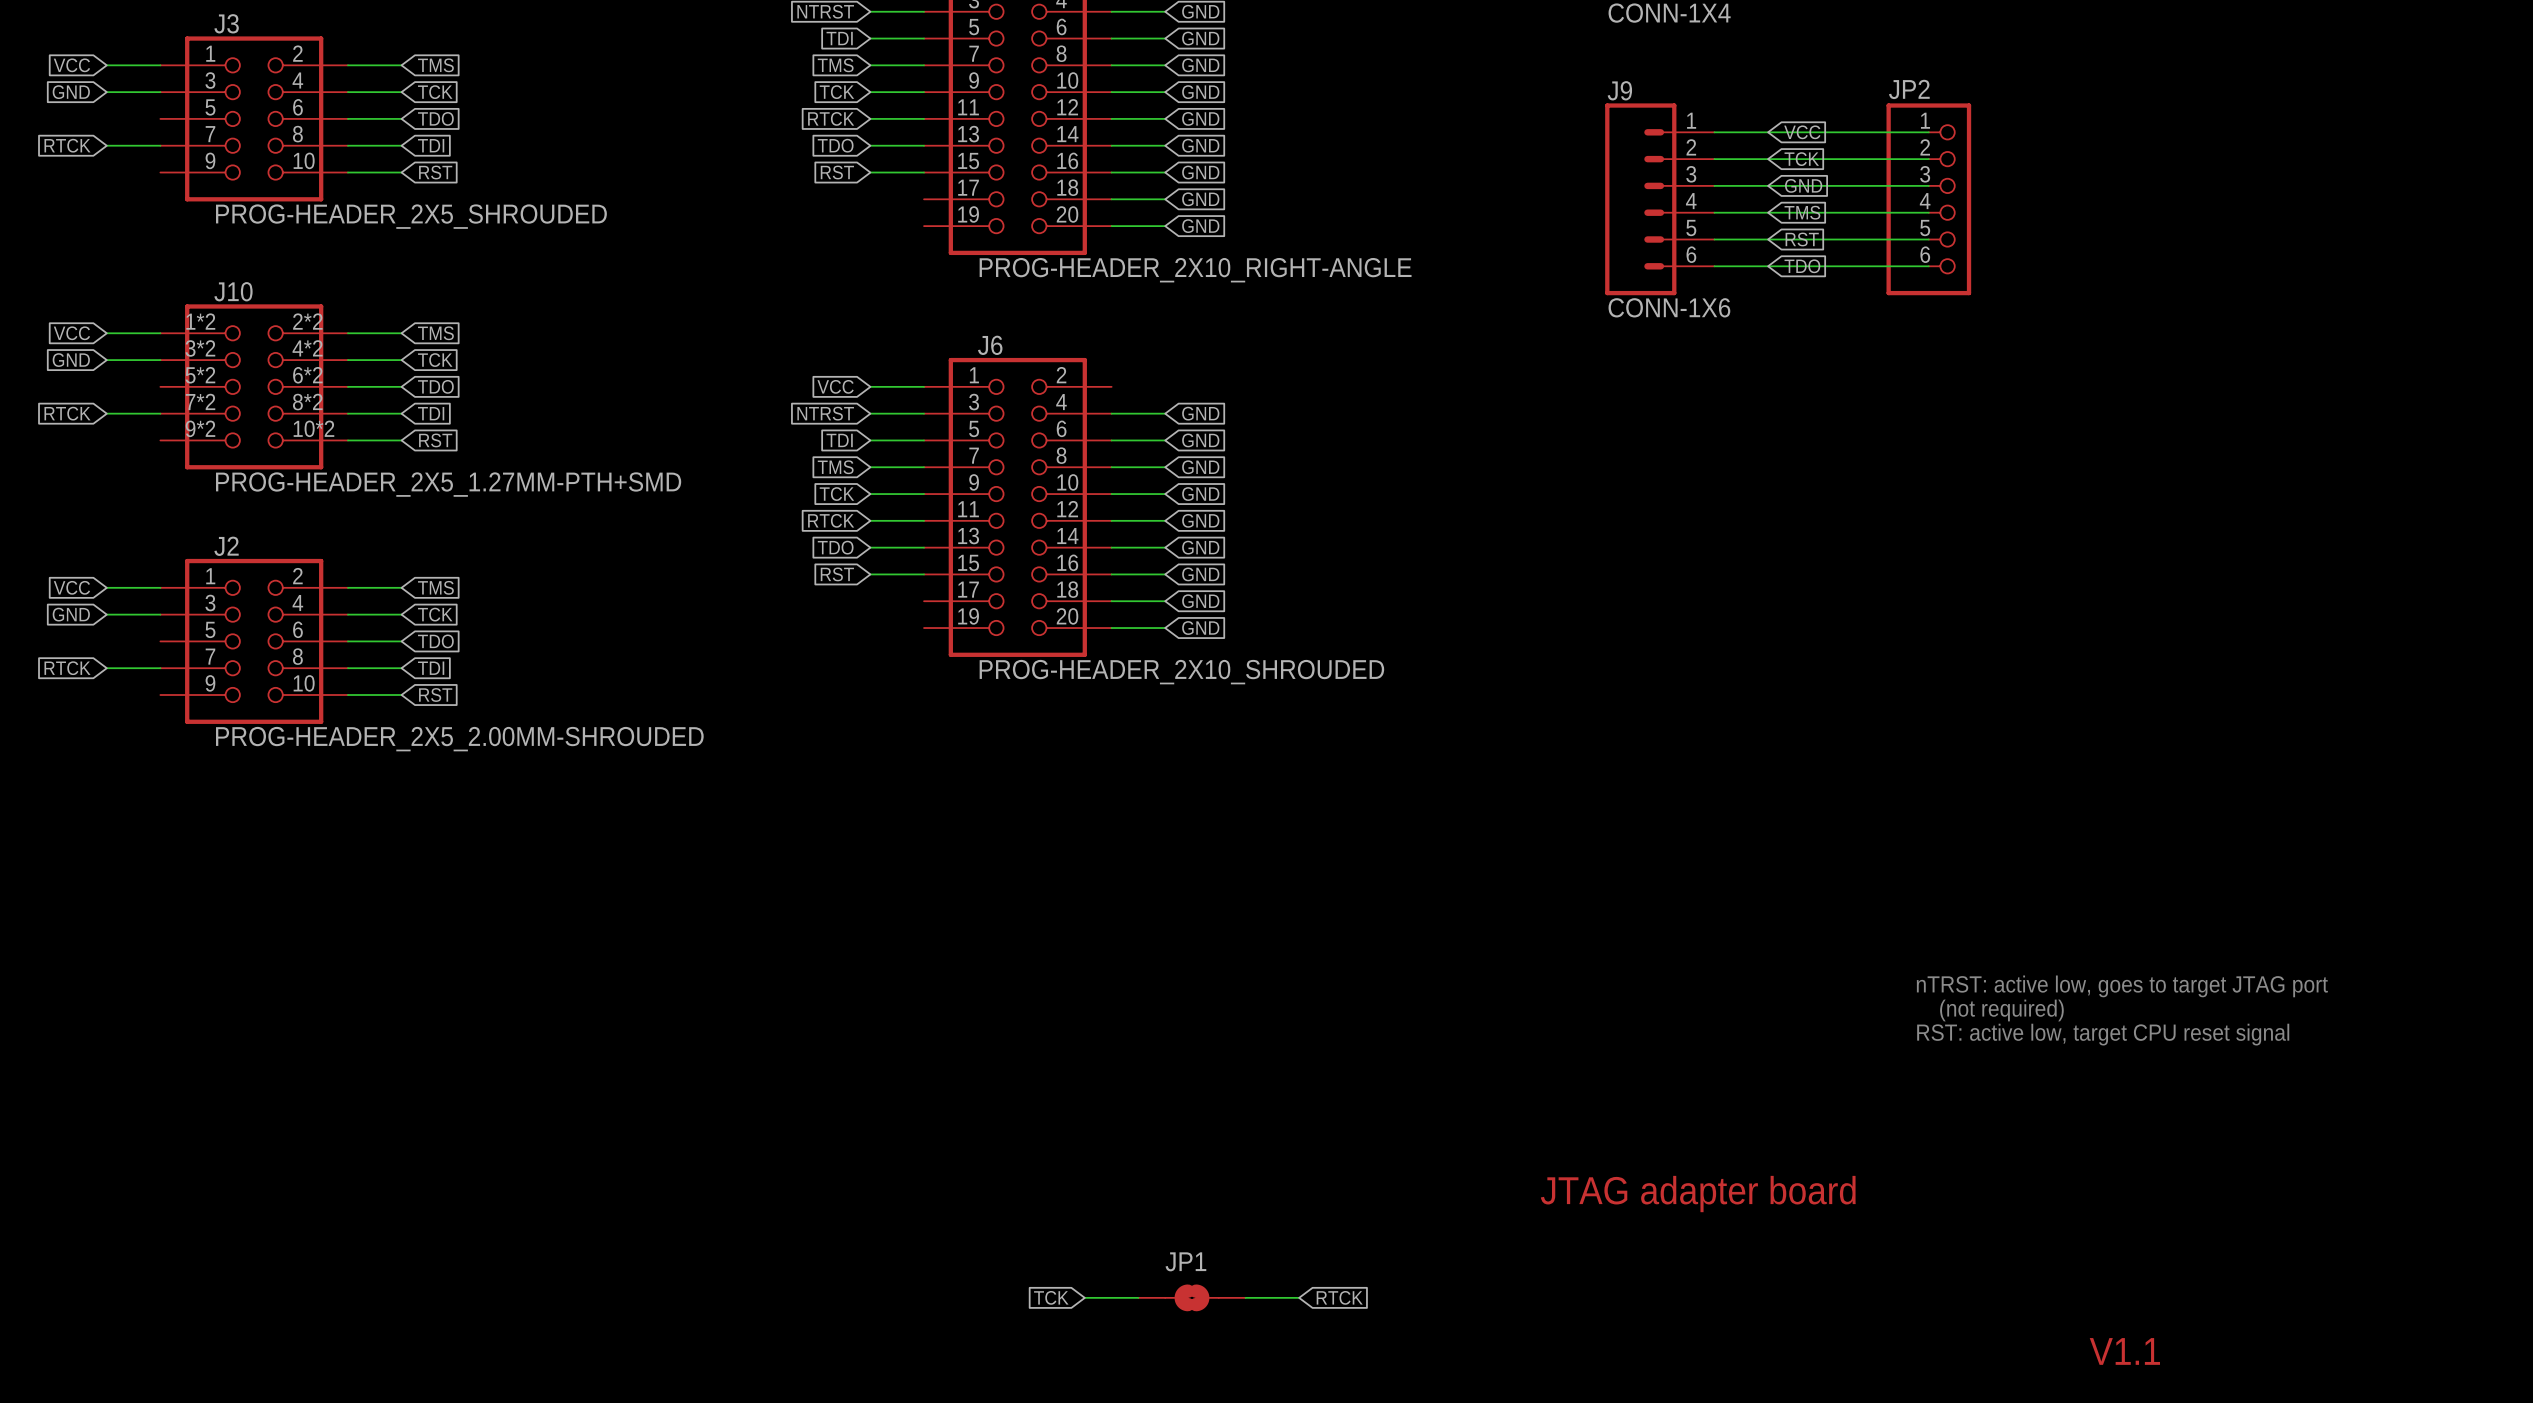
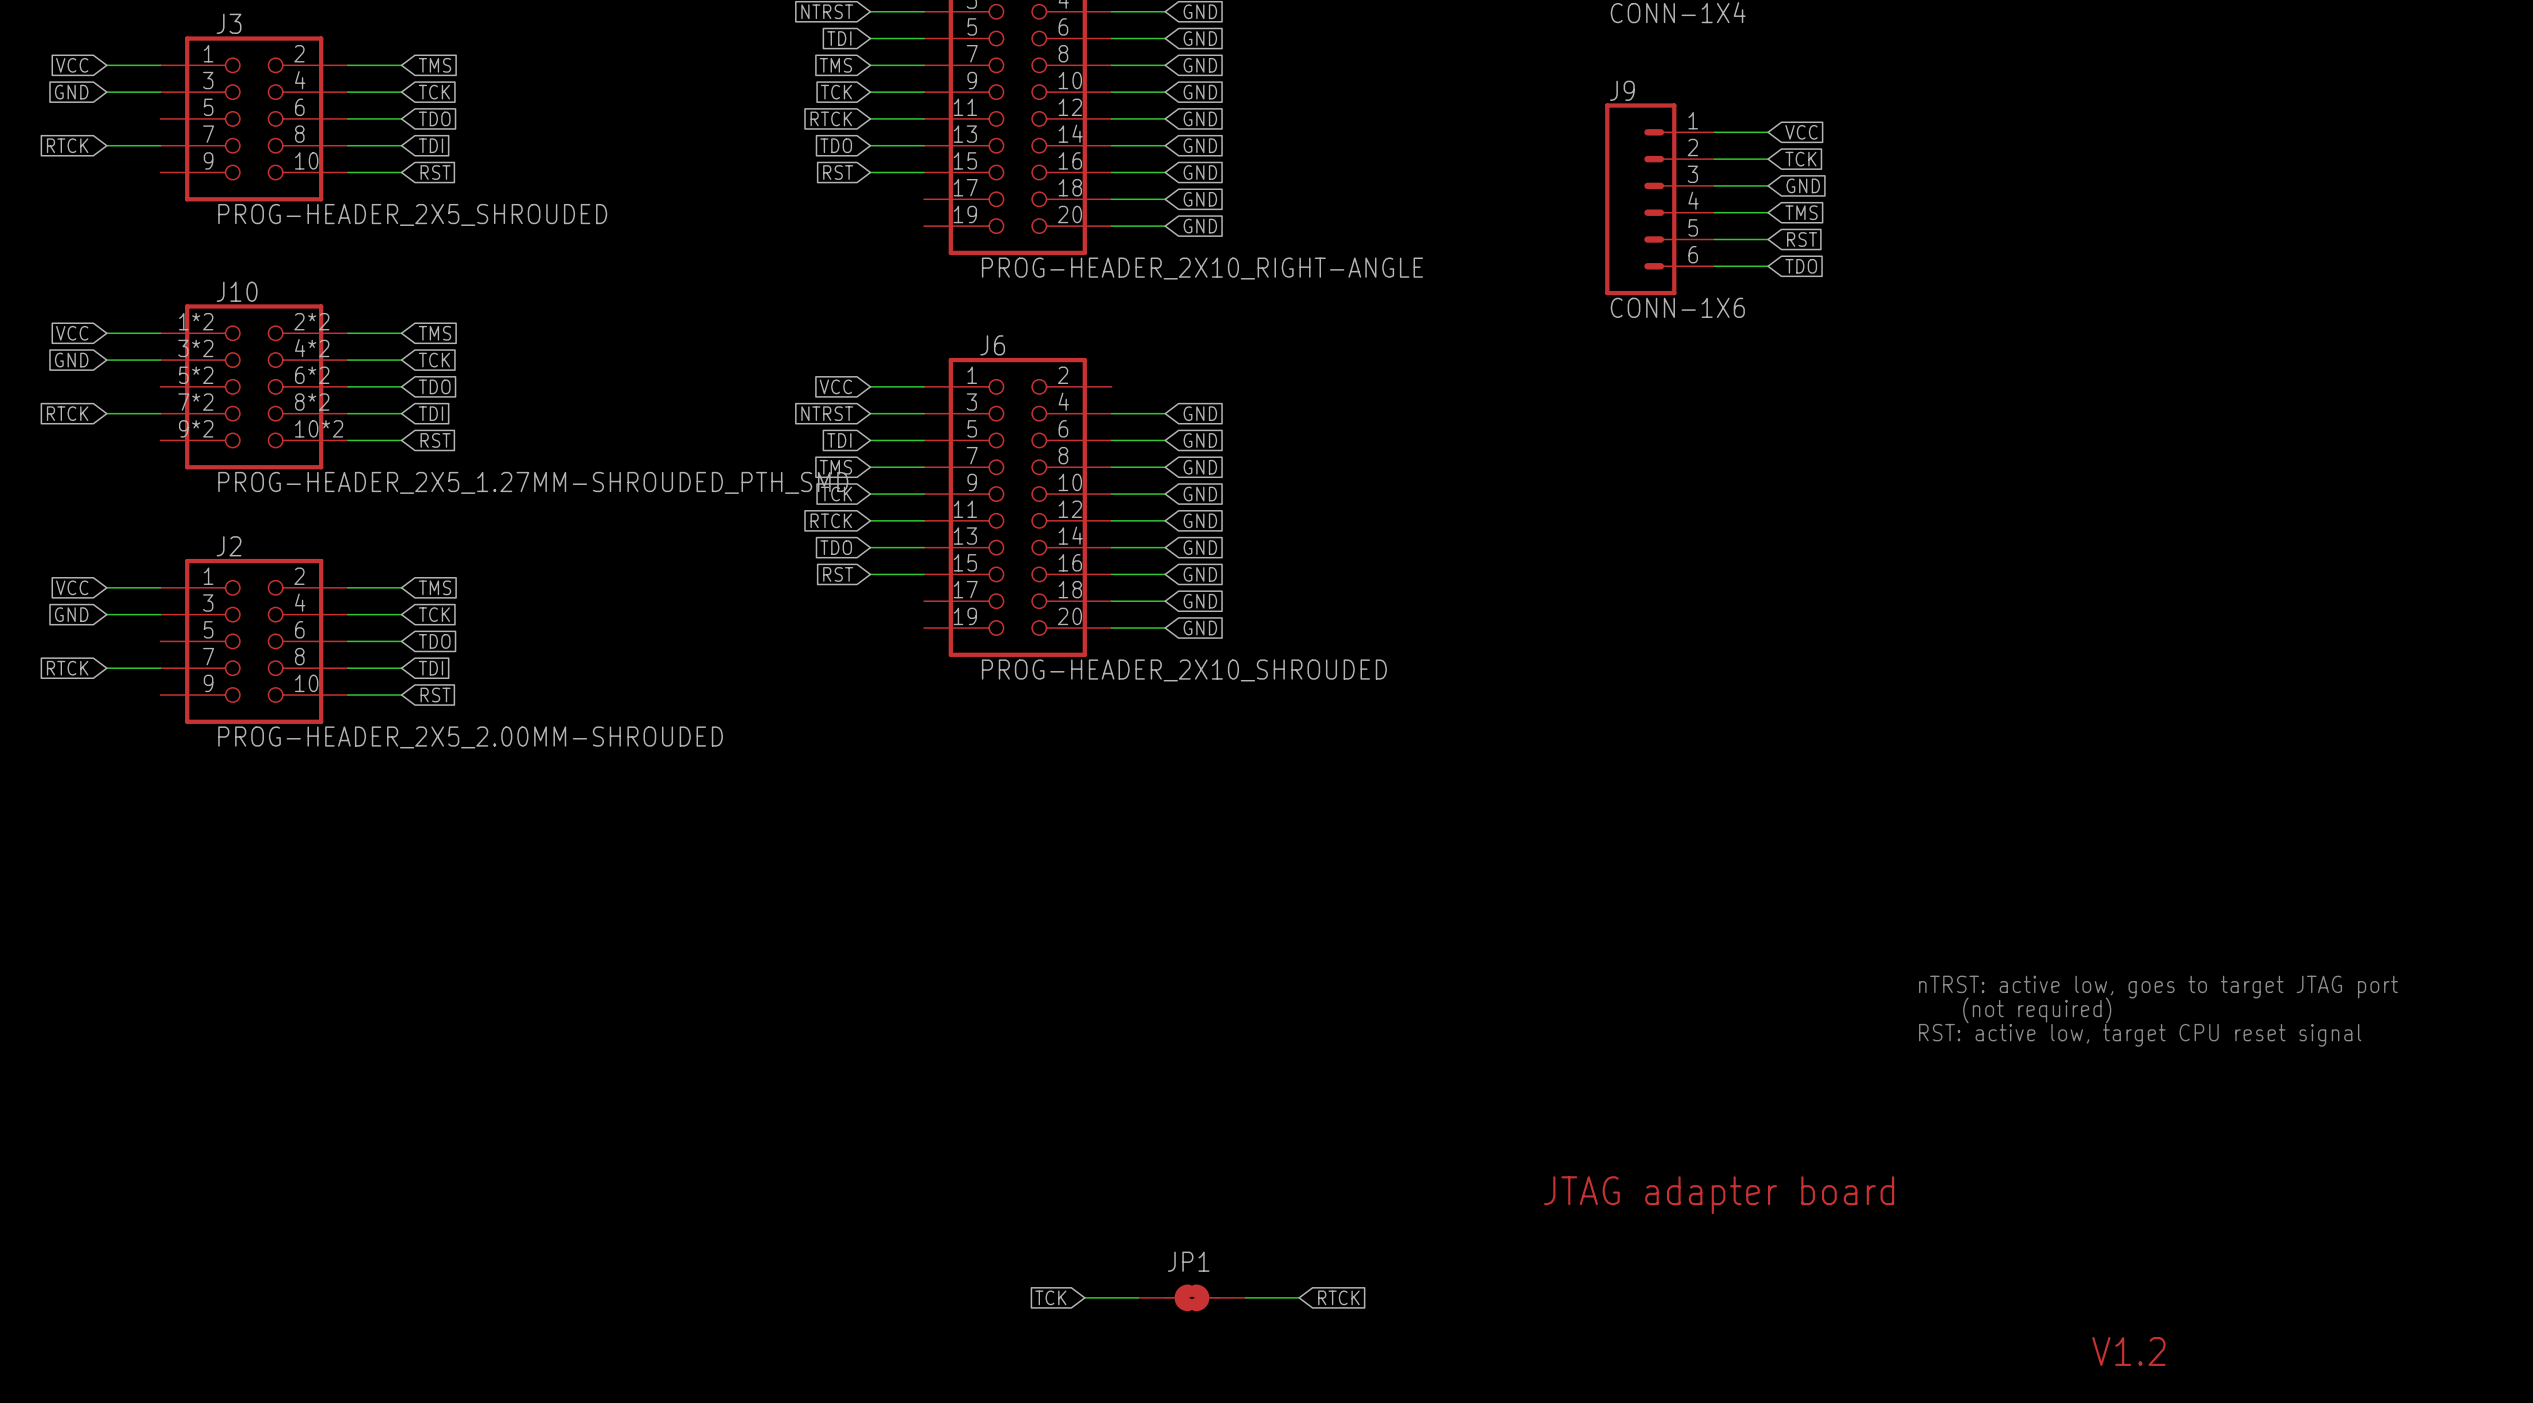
wire: (1768, 132) (1928, 132) -> none
wire: (1768, 159) (1928, 159) -> none
wire: (1768, 185) (1928, 185) -> none
JP2: (1928, 199) -> none
wire: (1768, 212) (1928, 212) -> none
wire: (1768, 239) (1928, 239) -> none
wire: (1768, 266) (1928, 266) -> none
J10 value: PROG-HEADER_2X5_1.27MM-PTH+SMD (448, 484) -> PROG-HEADER_2X5_1.27MM-SHROUDED_PTH_SMD (533, 482)
text: V1.1 (2124, 1351) -> V1.2 (2128, 1351)

